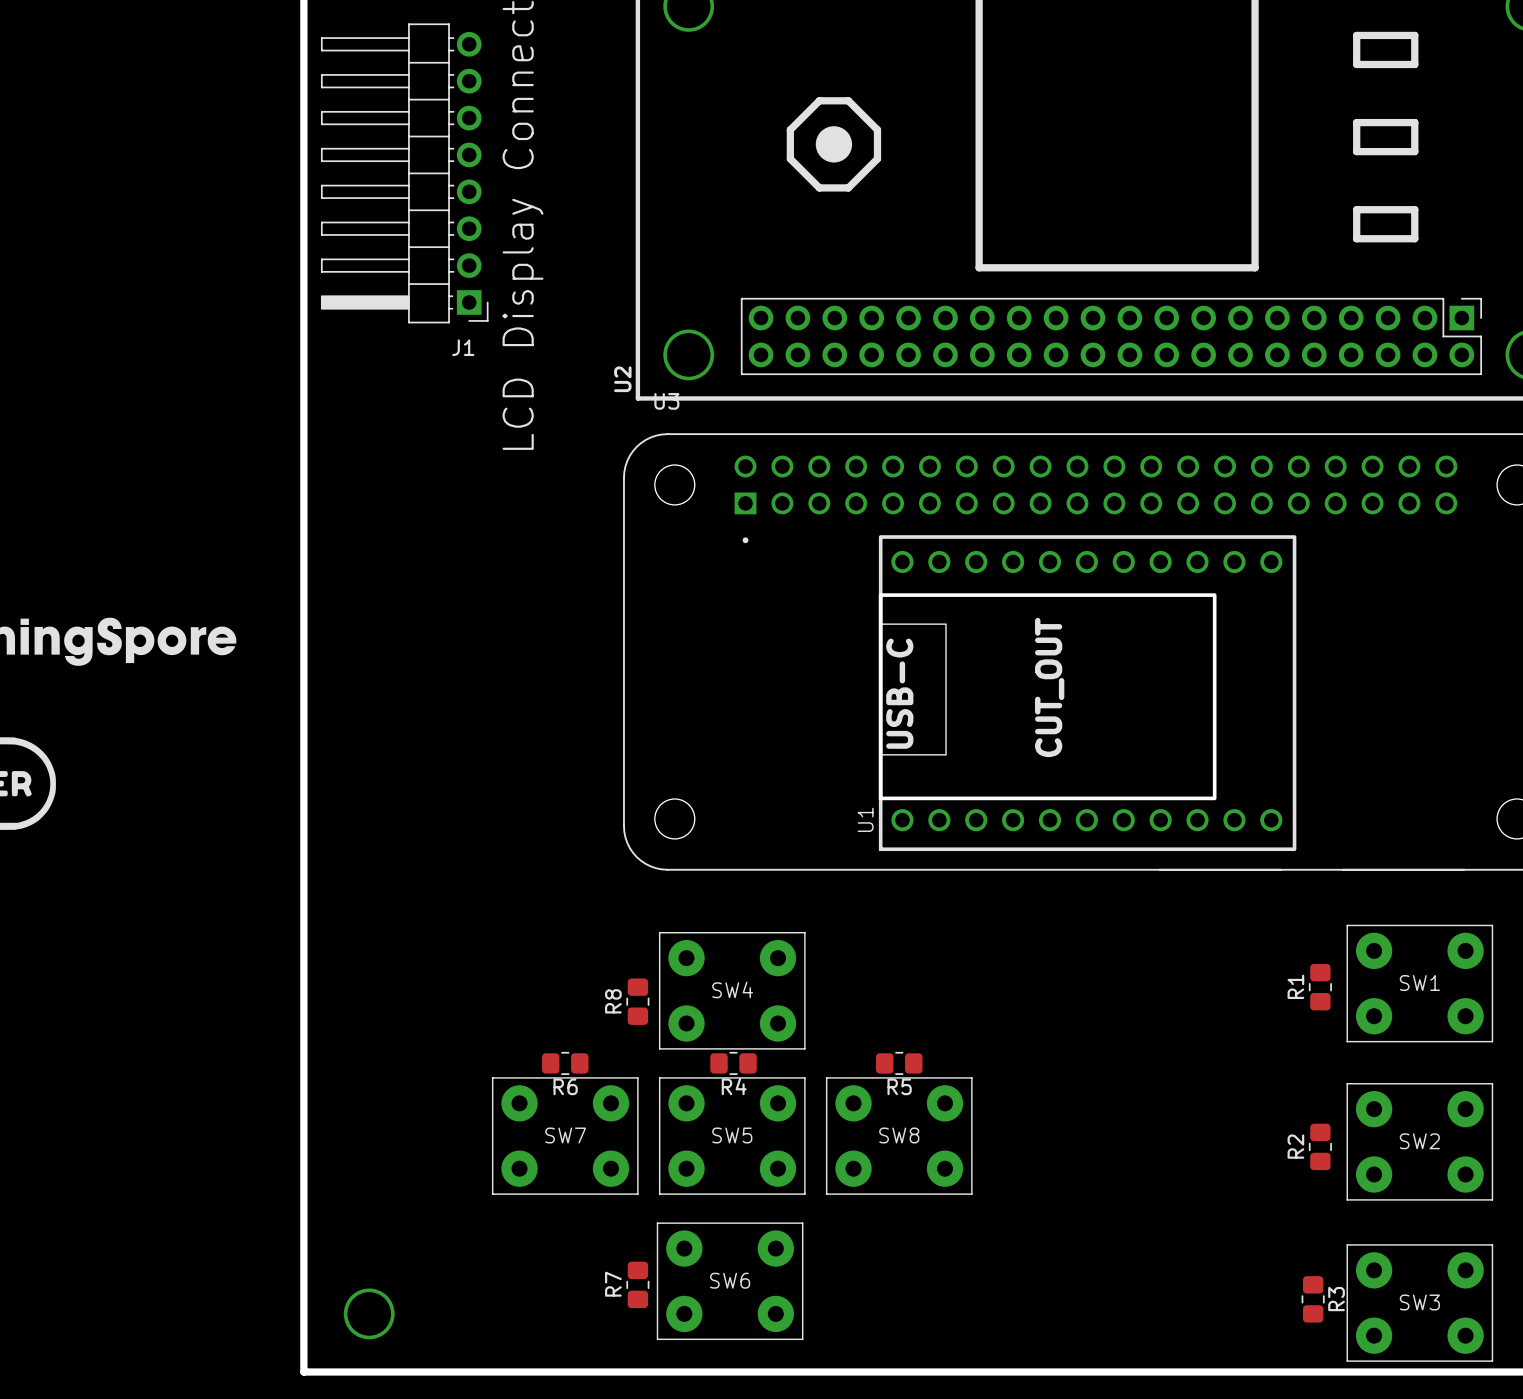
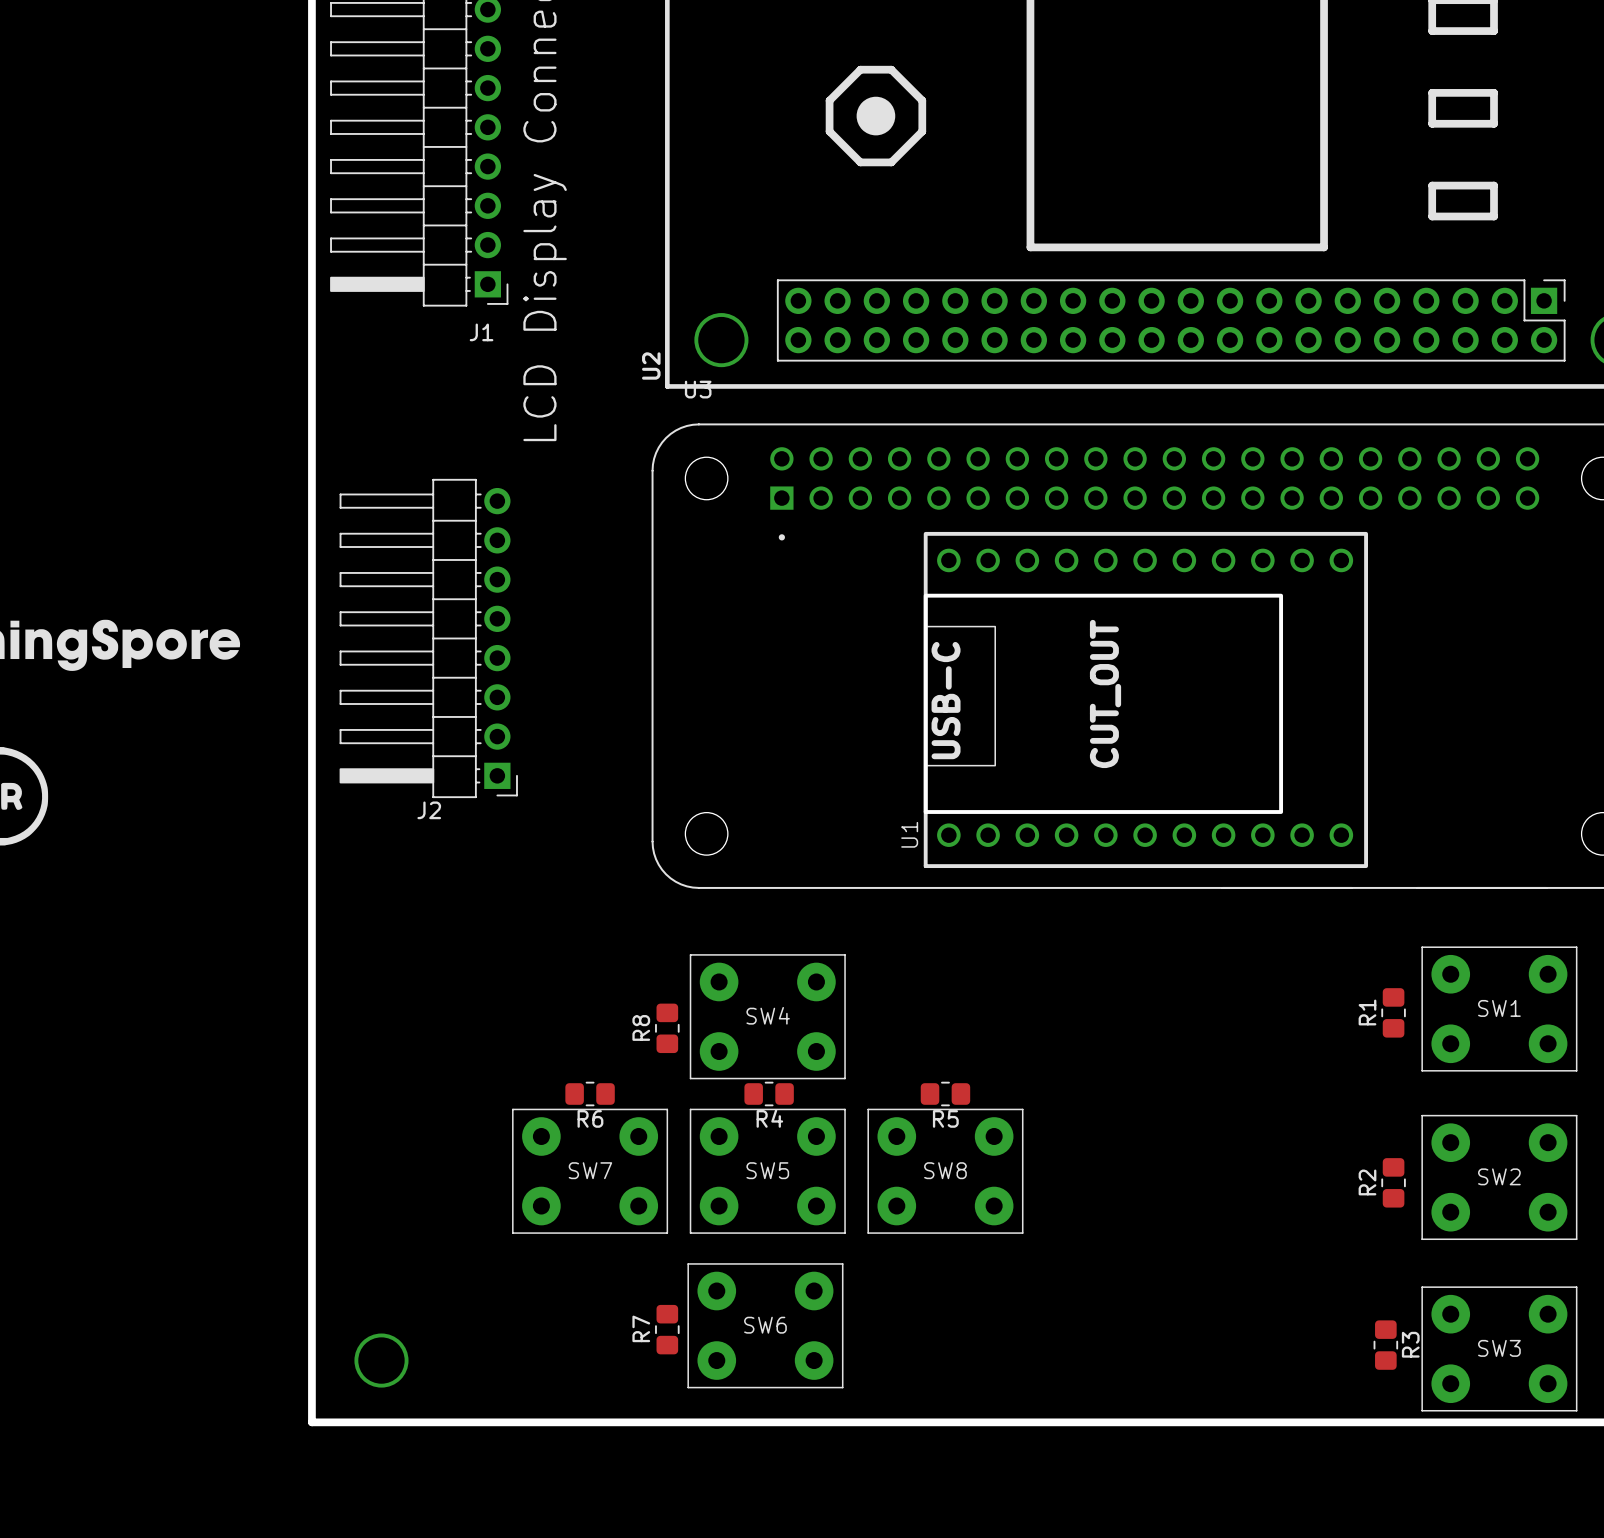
J2: none -> (428, 638)

